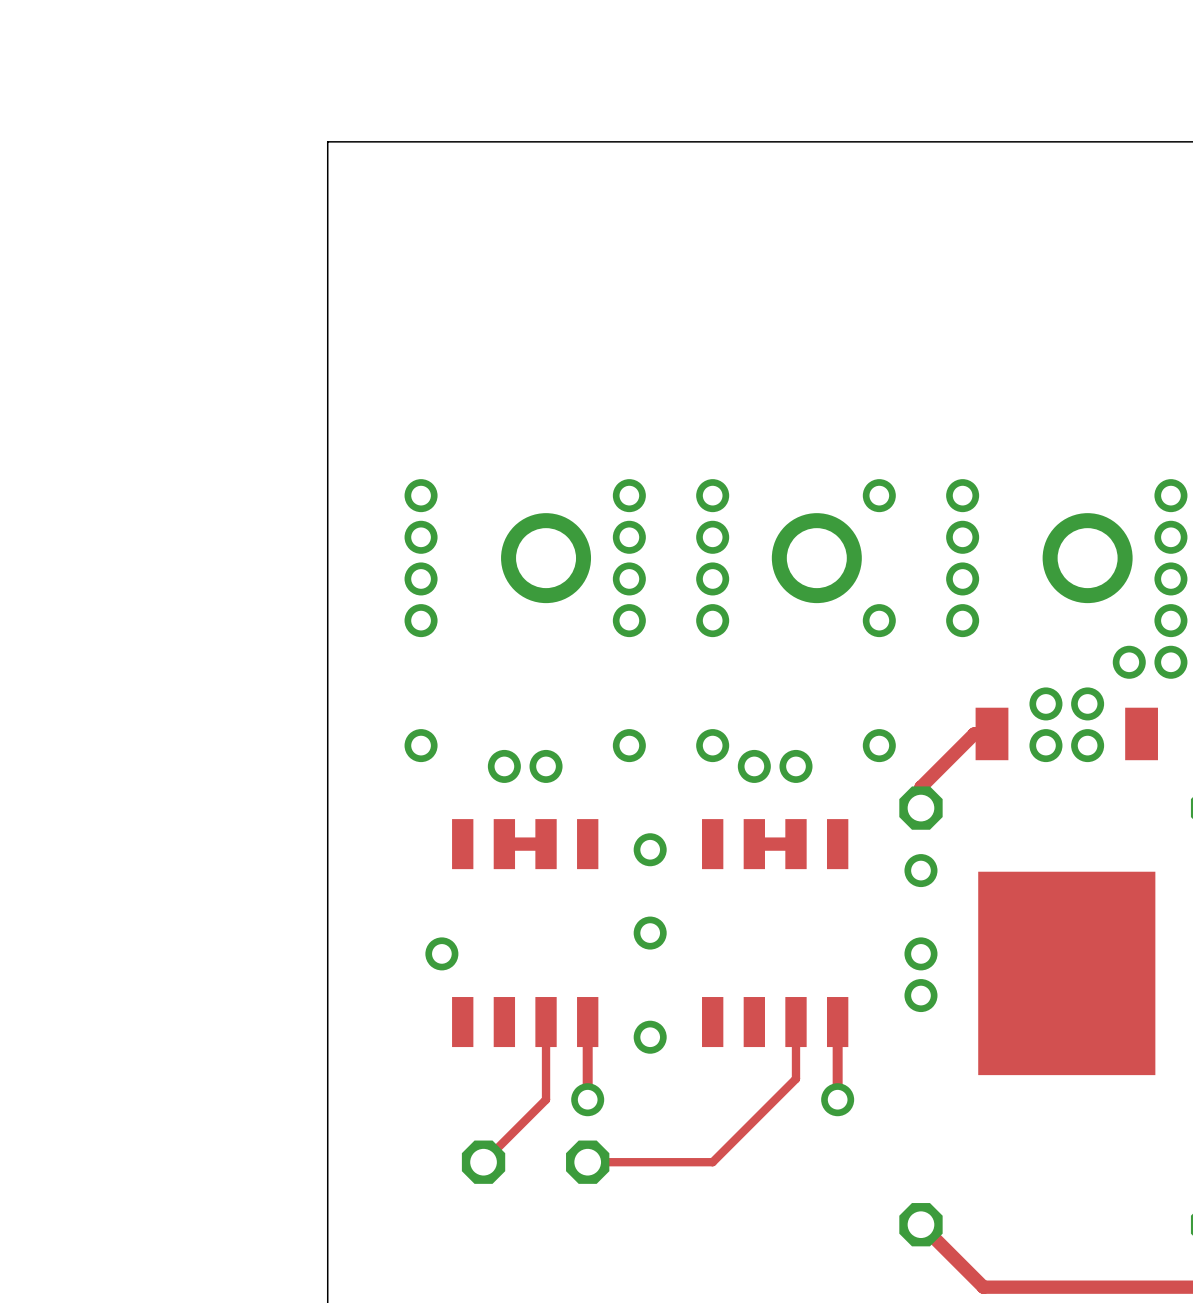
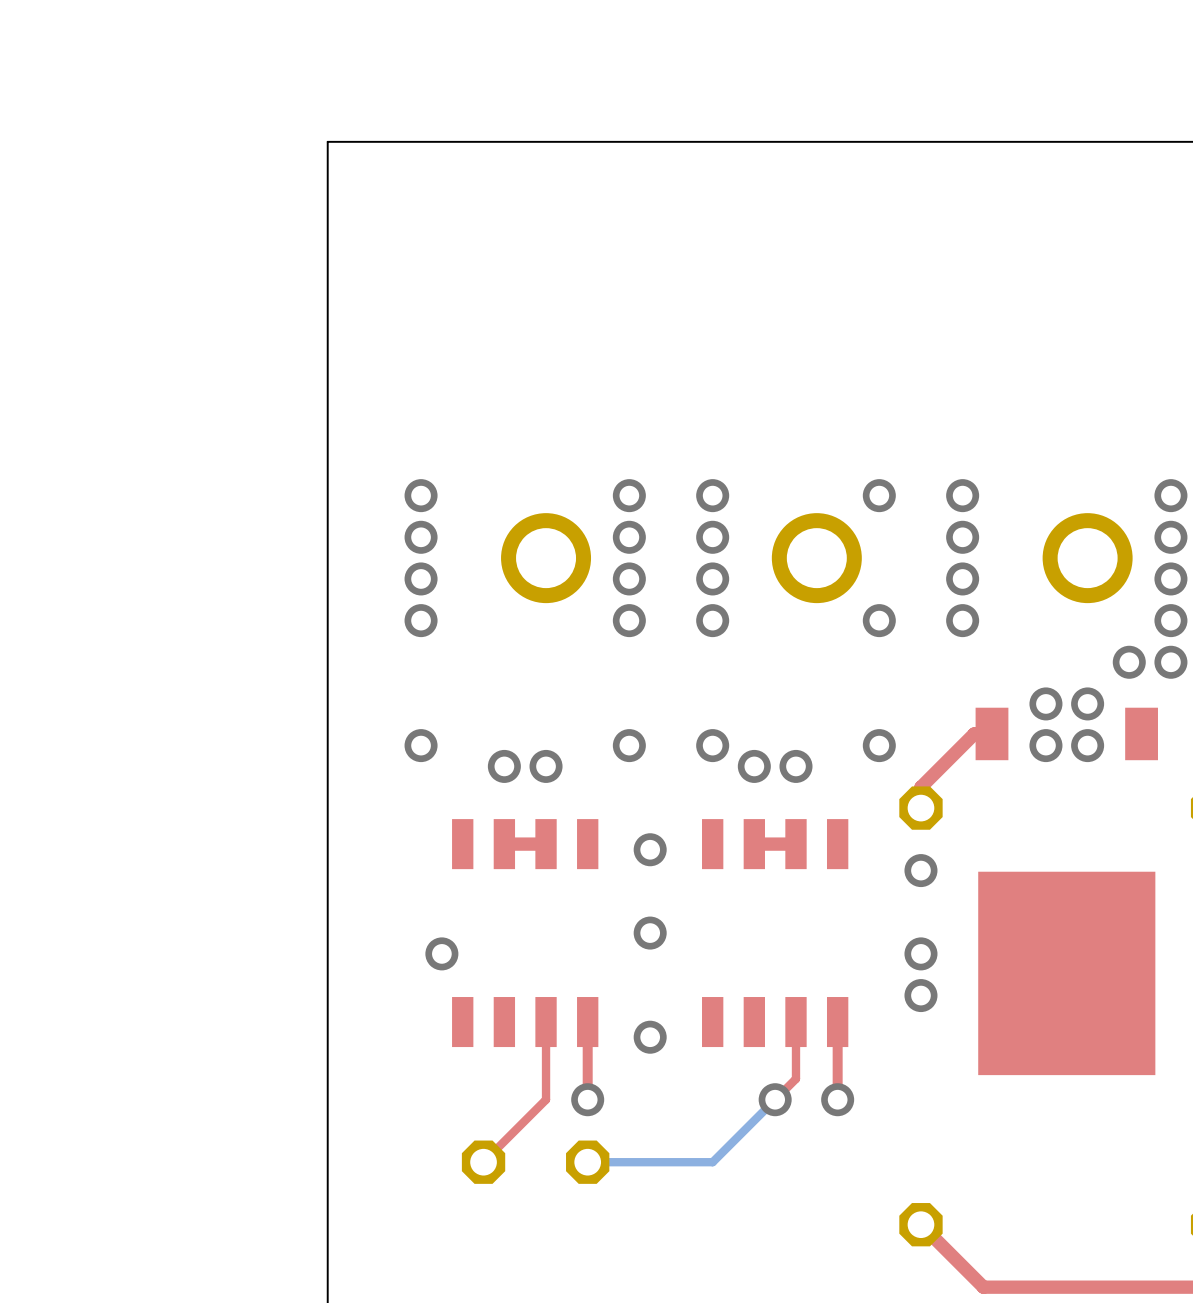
top track: (775, 1099) (712, 1162) (587, 1162) -> none
bottom track: none -> (775, 1099) (712, 1162) (587, 1162)
via: none -> (775, 1099)

